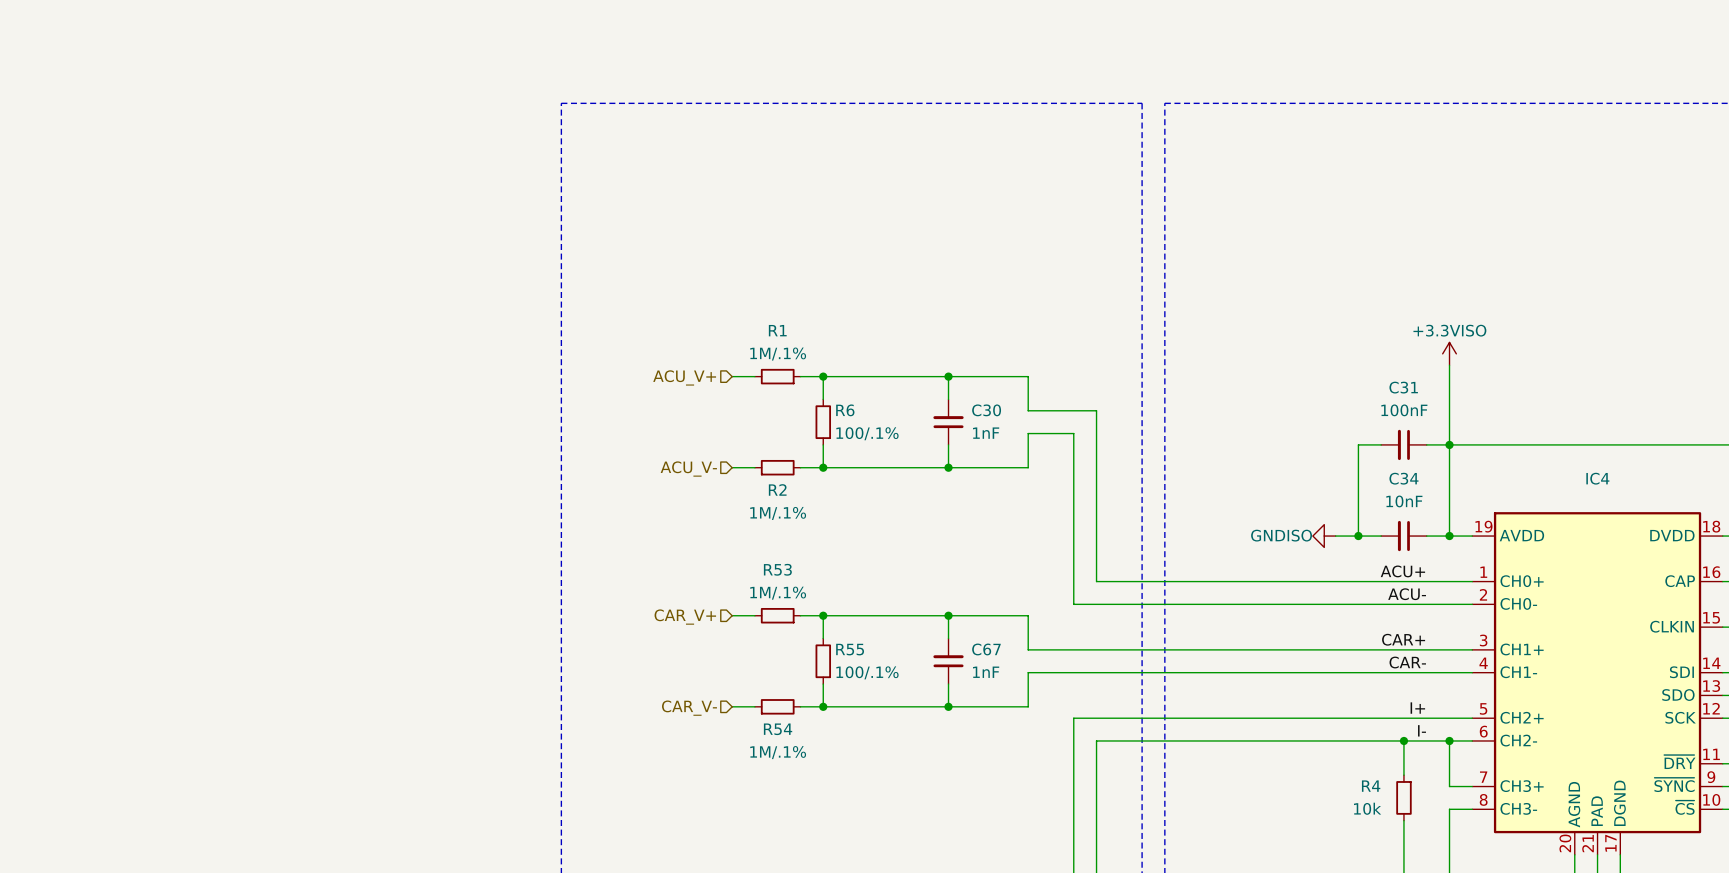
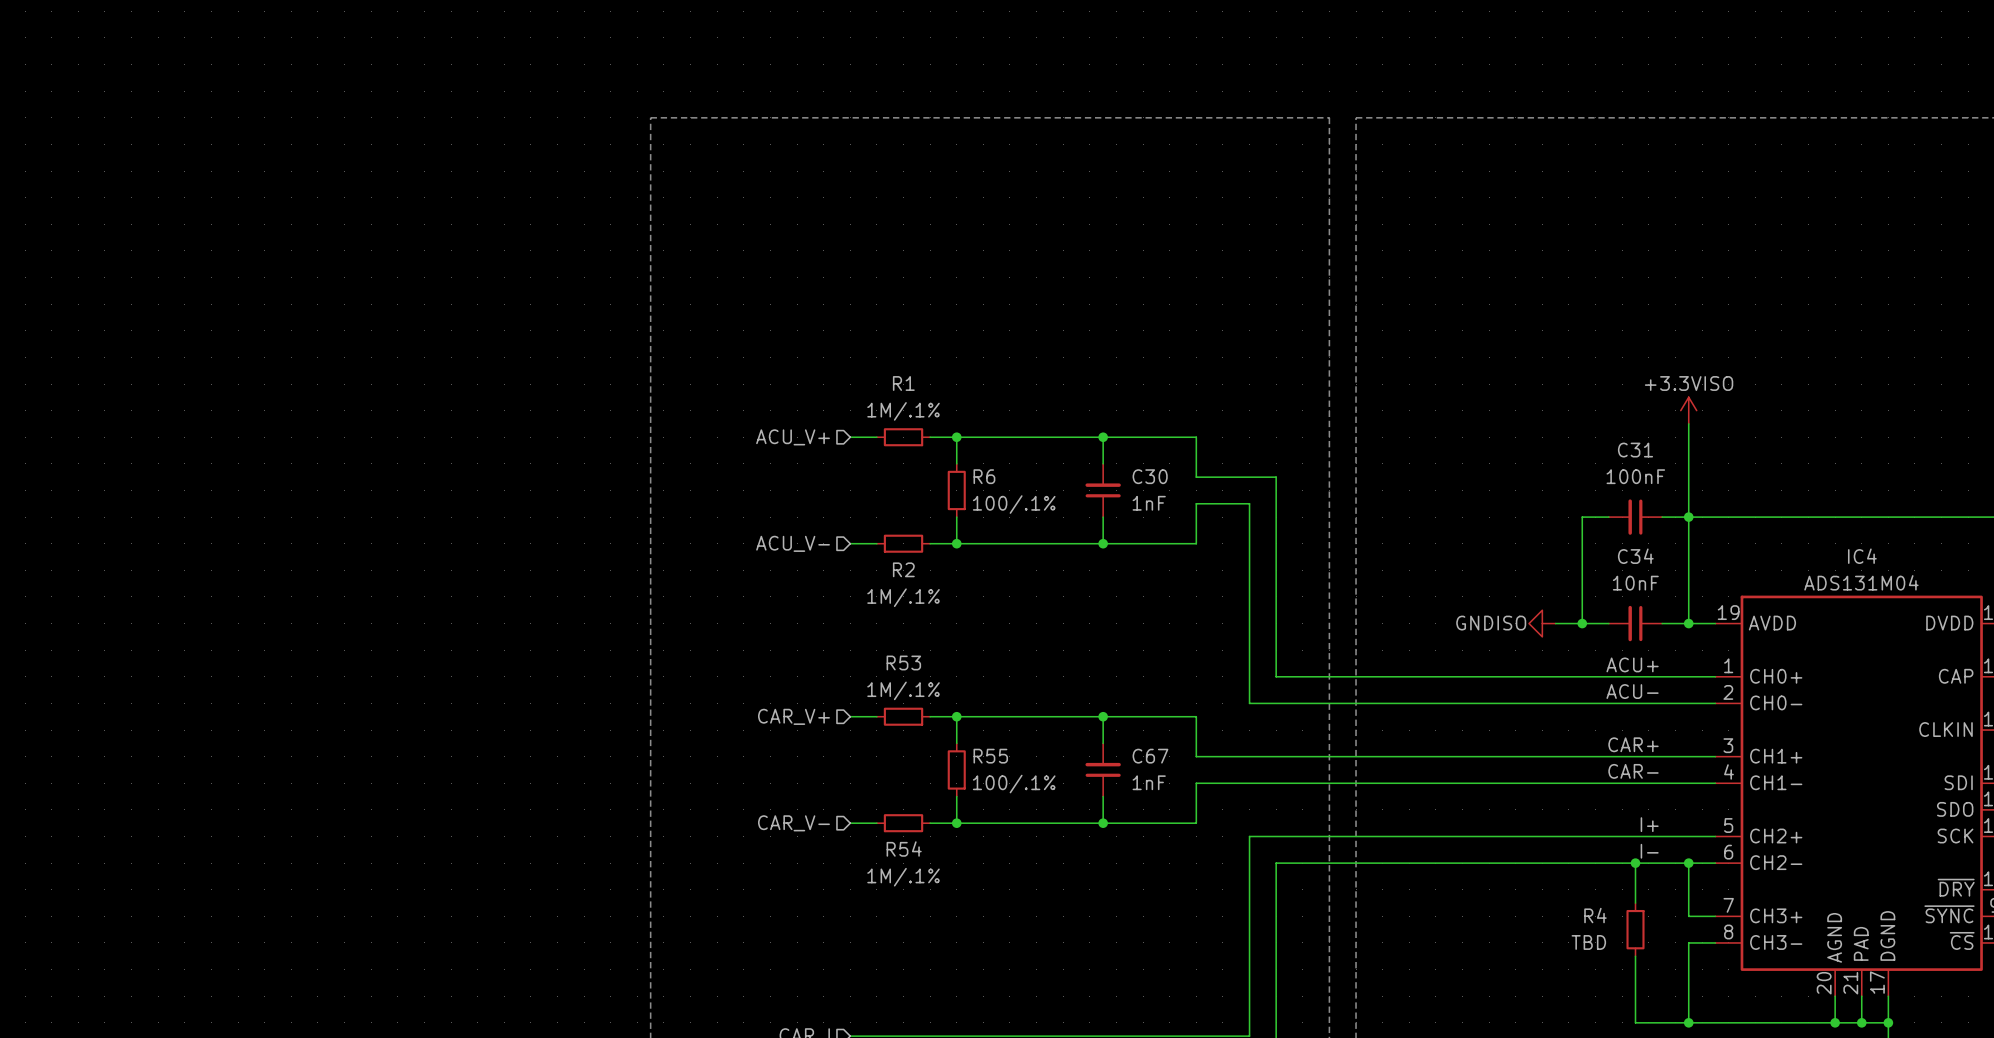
IC4 value: none -> ADS131M04 (1861, 582)
R4 value: 10k (1367, 808) -> TBD (1588, 942)

